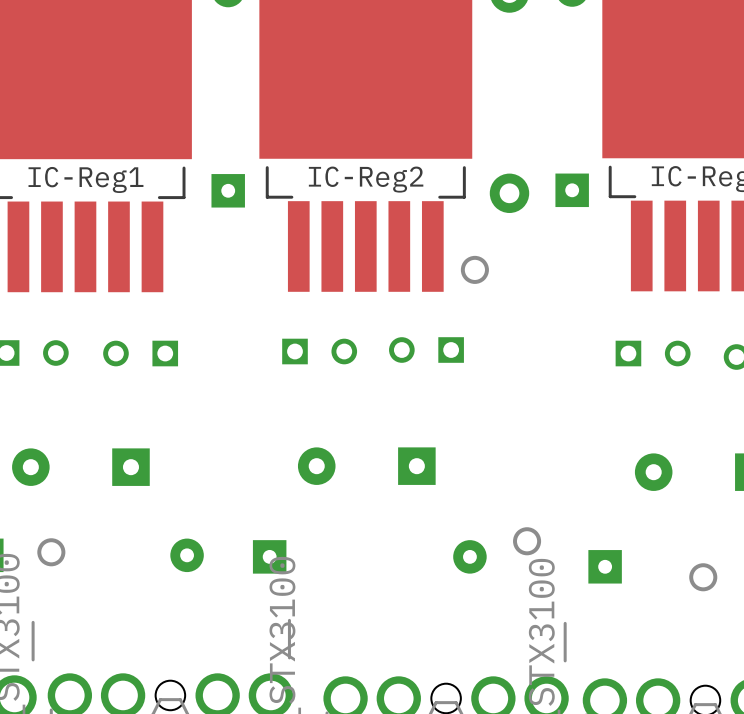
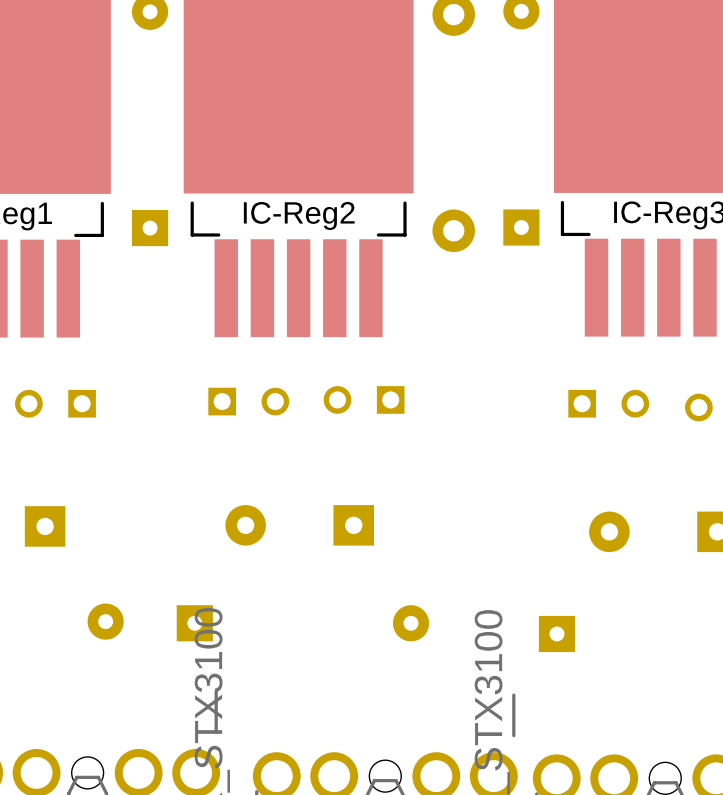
drawing: [460, 255, 489, 284] -> none
drawing: [513, 527, 542, 556] -> none
drawing: [689, 563, 718, 592] -> none

